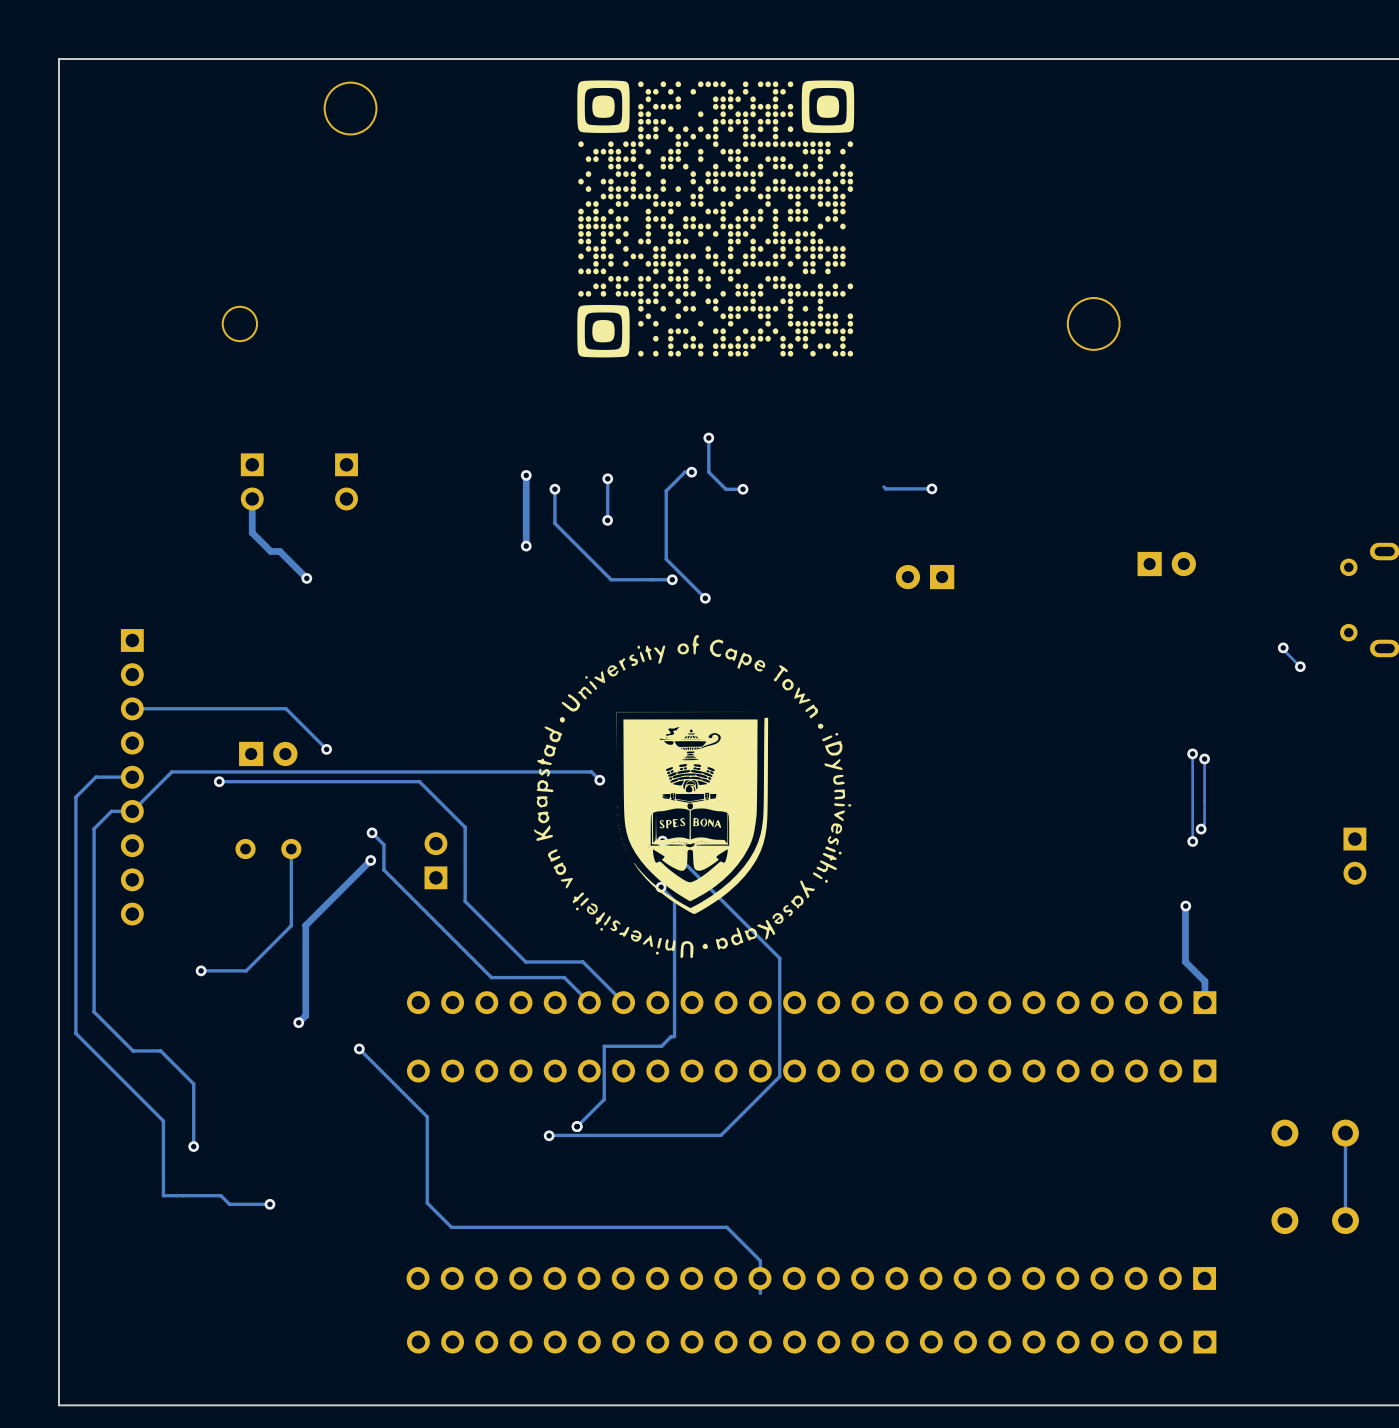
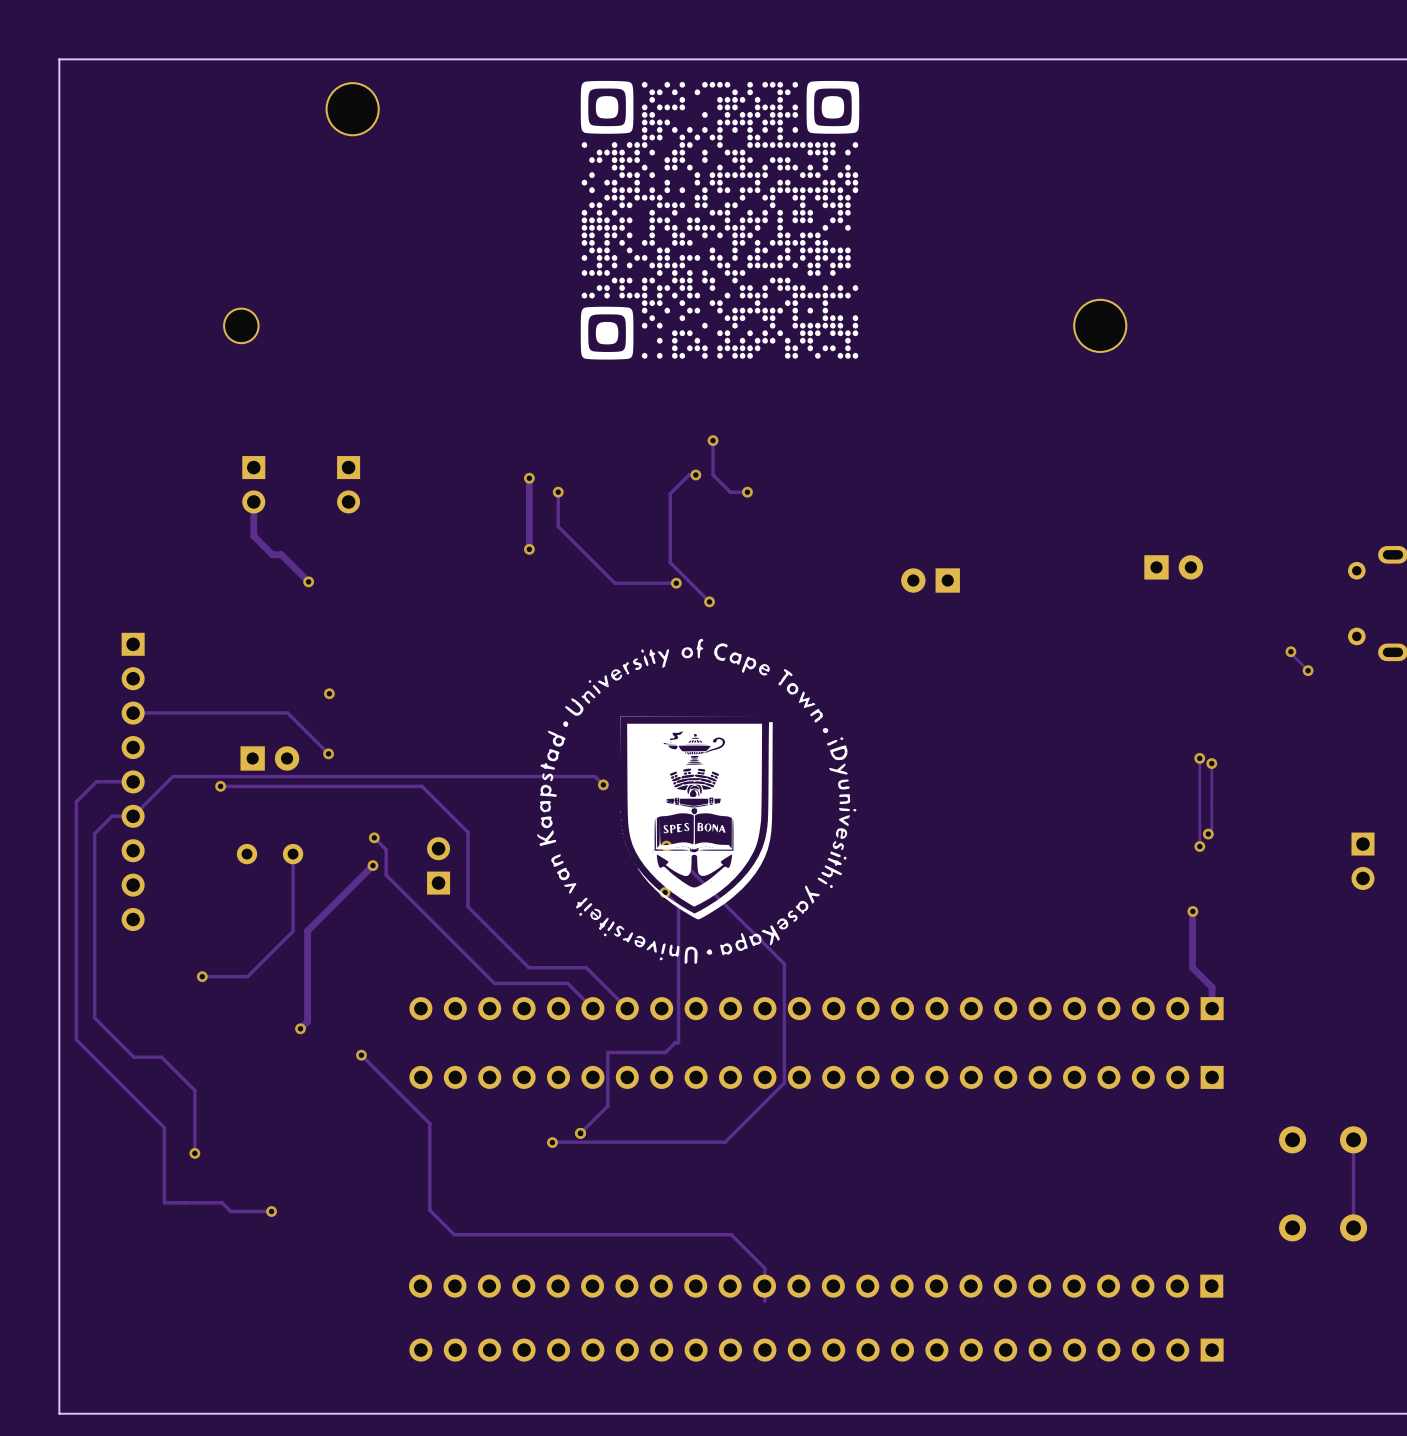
track: (607, 478) (607, 520) -> none
via: (607, 478) -> none
track: (884, 487) (885, 488) (931, 488) -> none
via: (931, 488) -> none
via: (607, 520) -> none
via: none -> (329, 693)

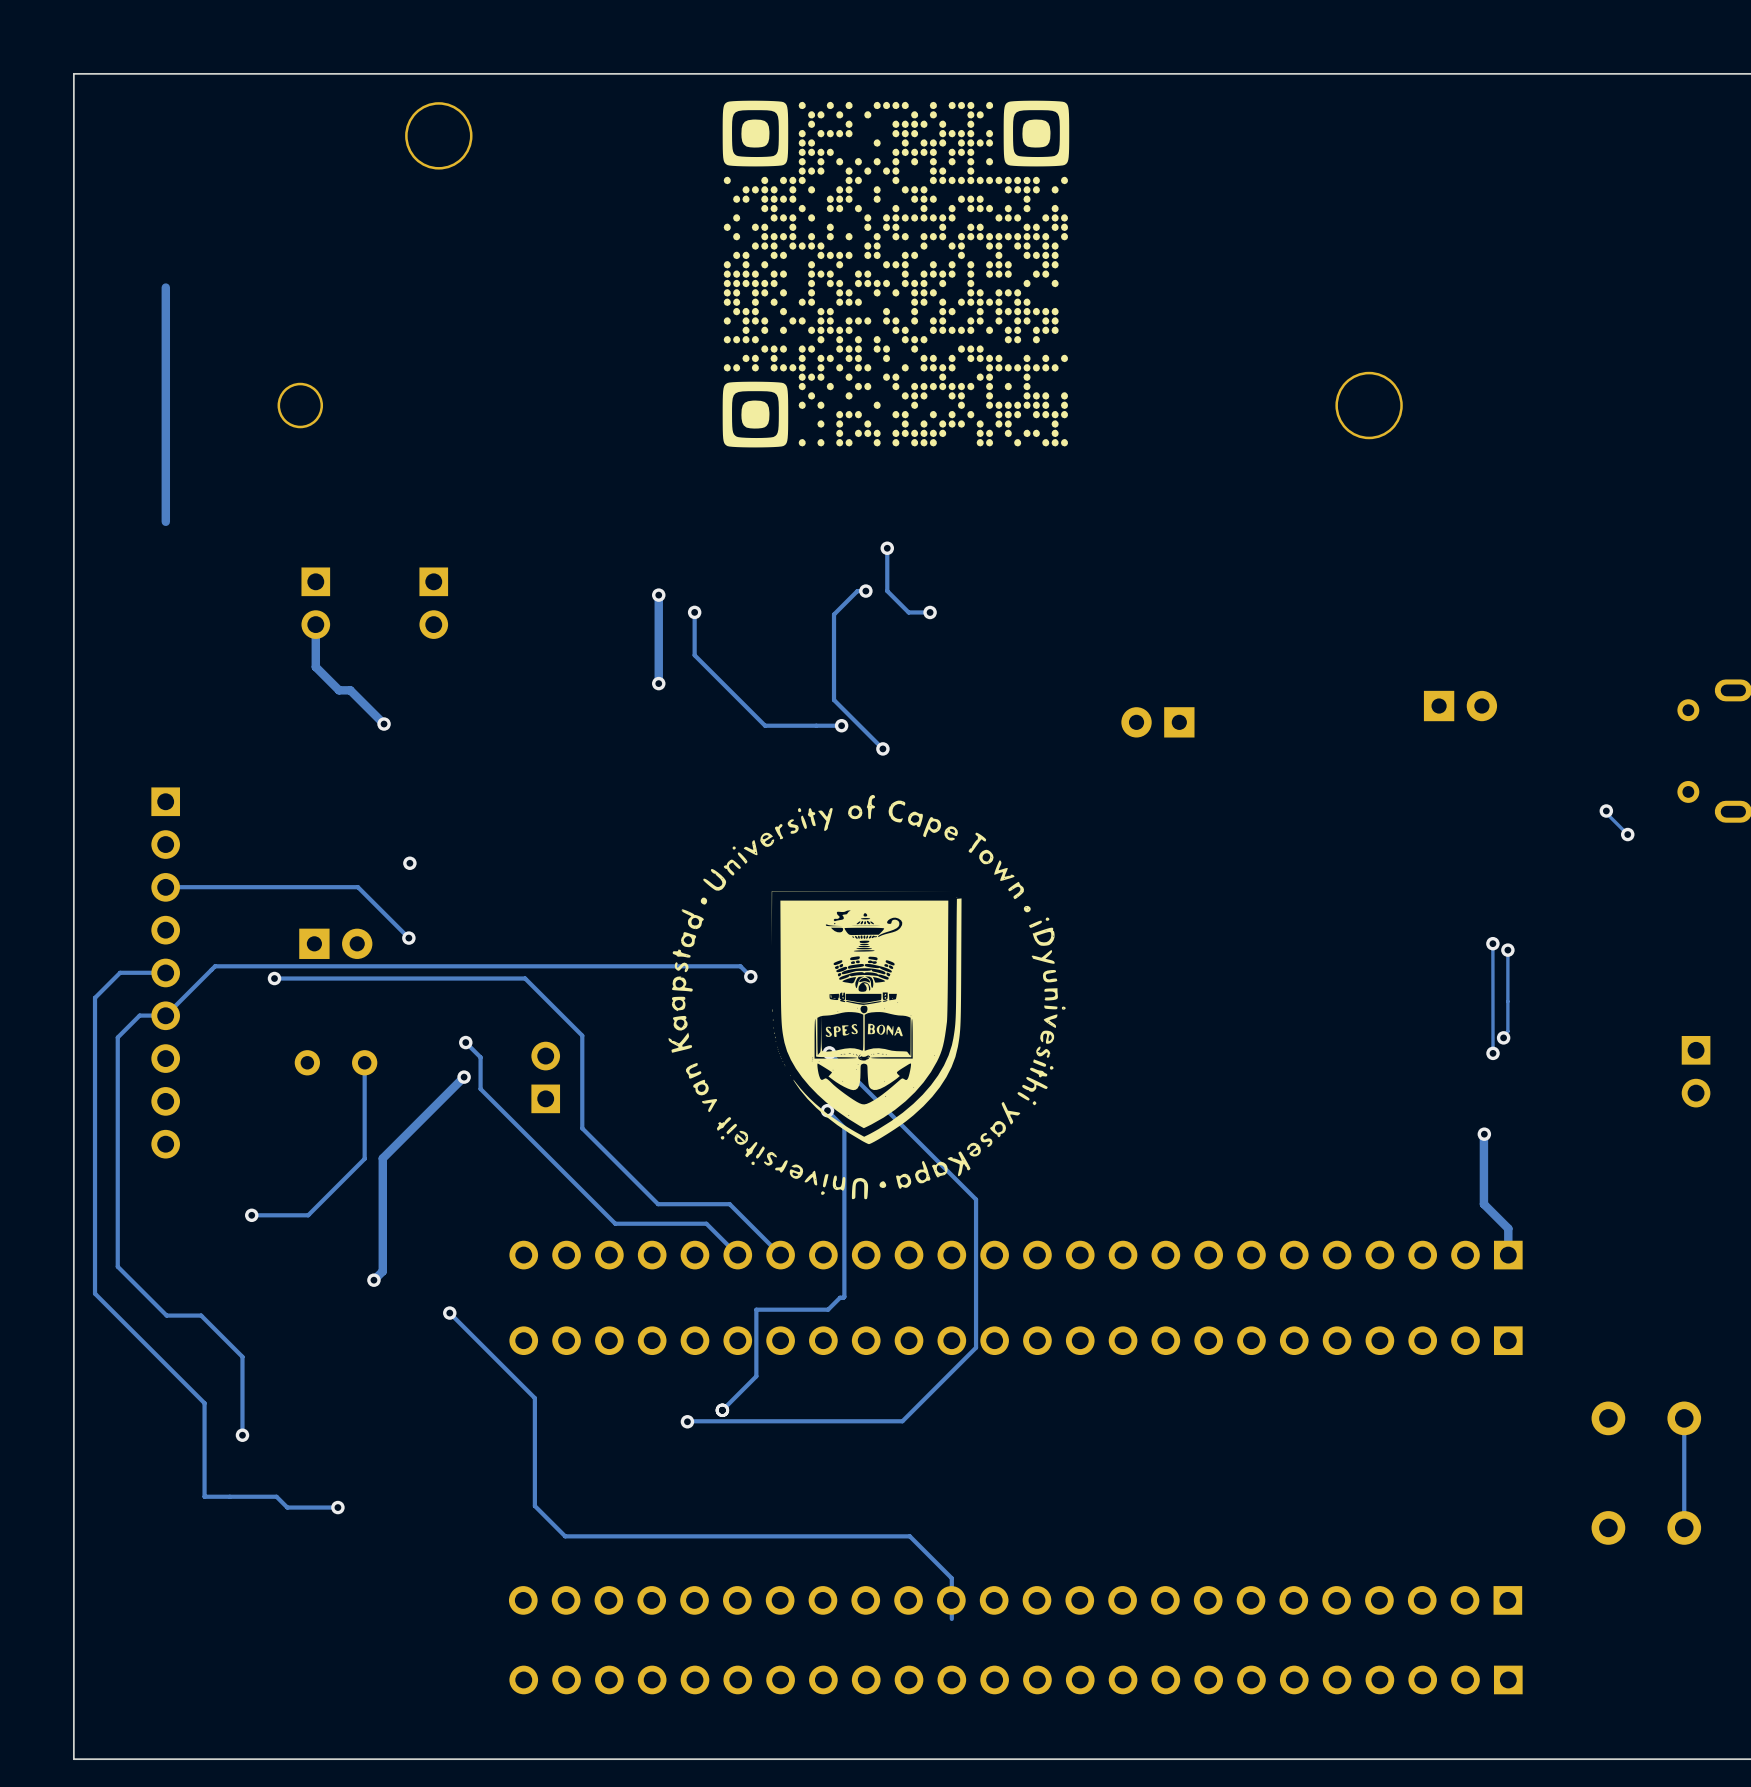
track: none -> (165, 287) (165, 521)

